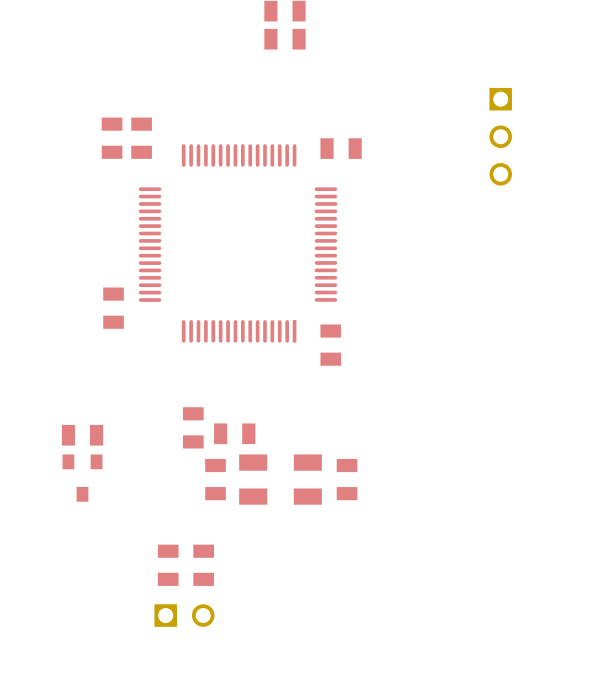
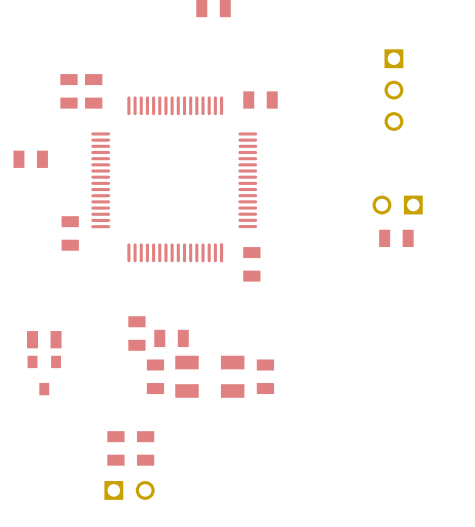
part: none -> (30, 159)
part: none -> (397, 205)
part: none -> (396, 238)

